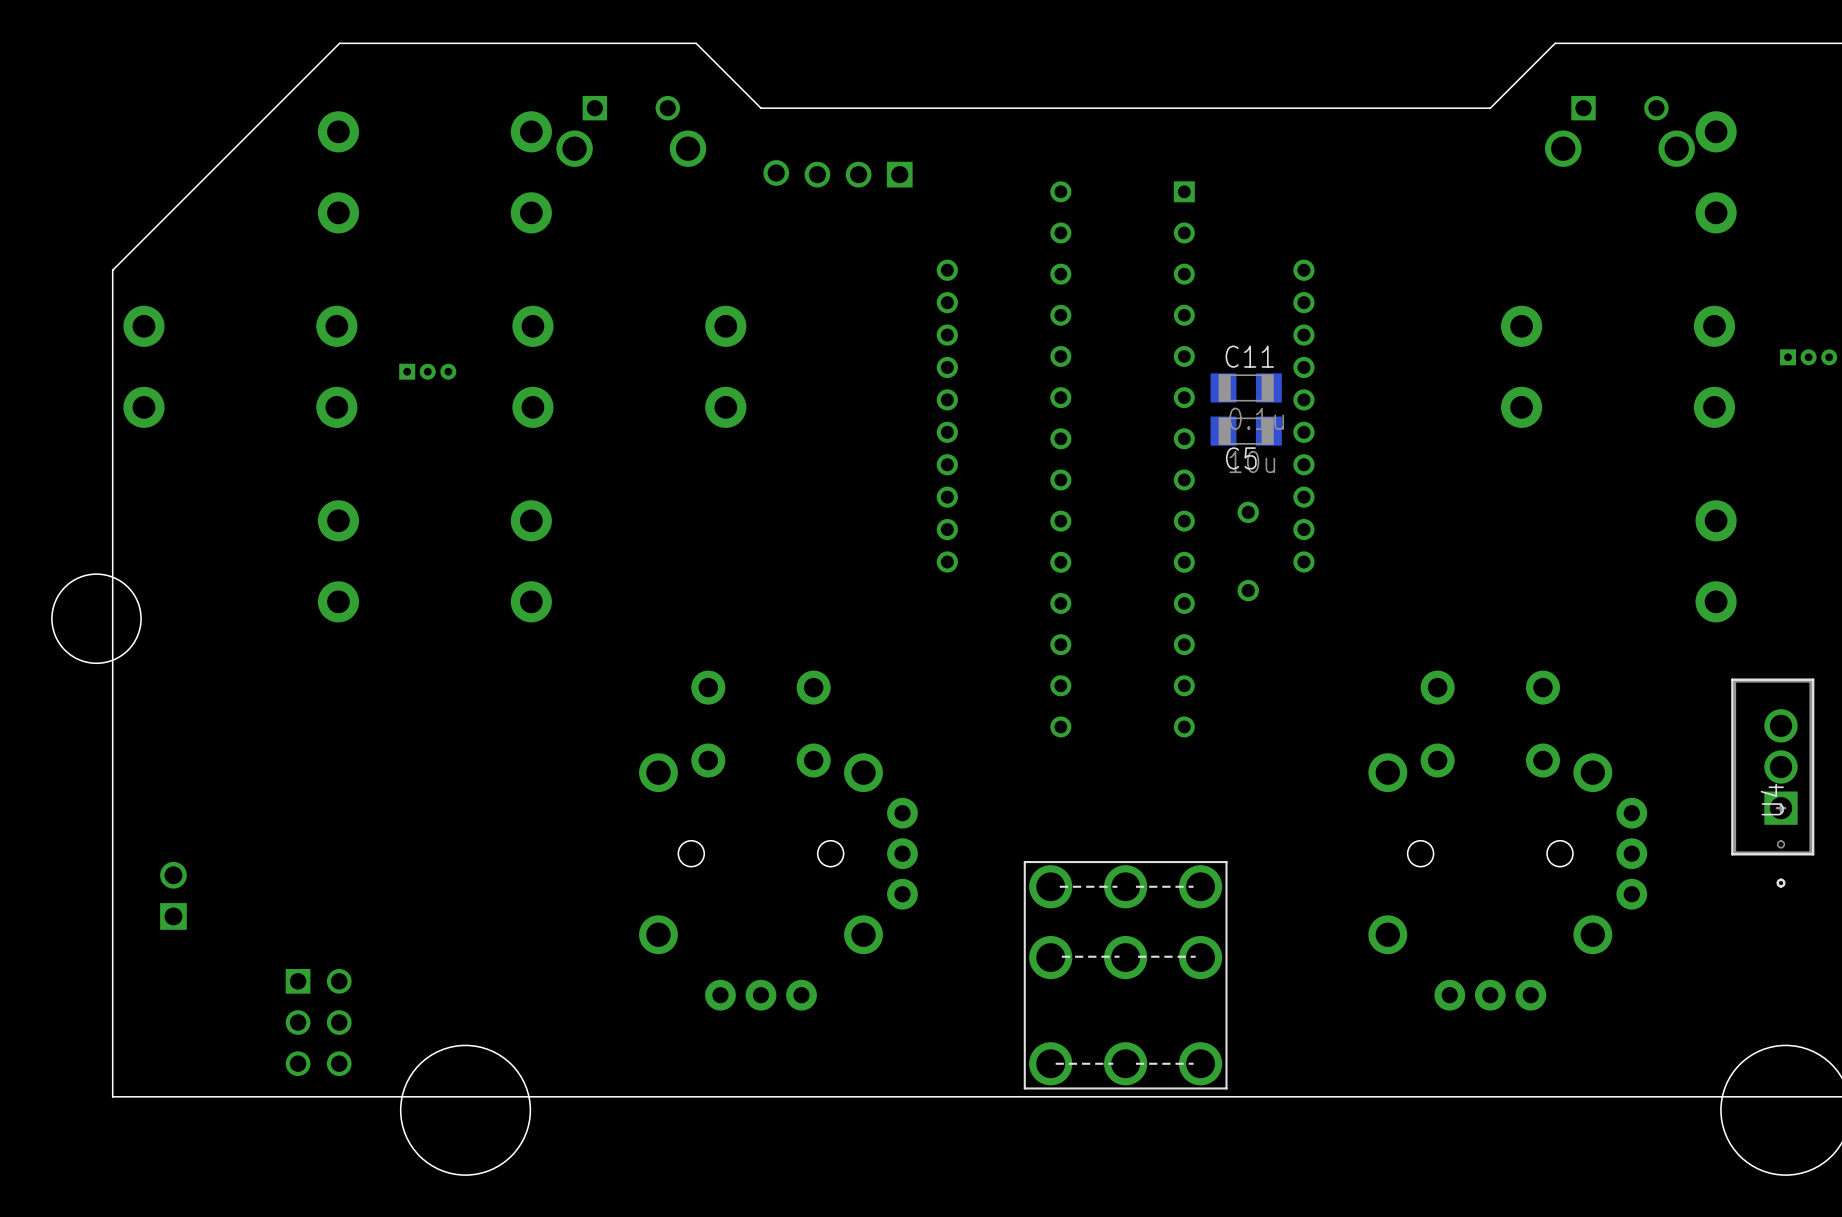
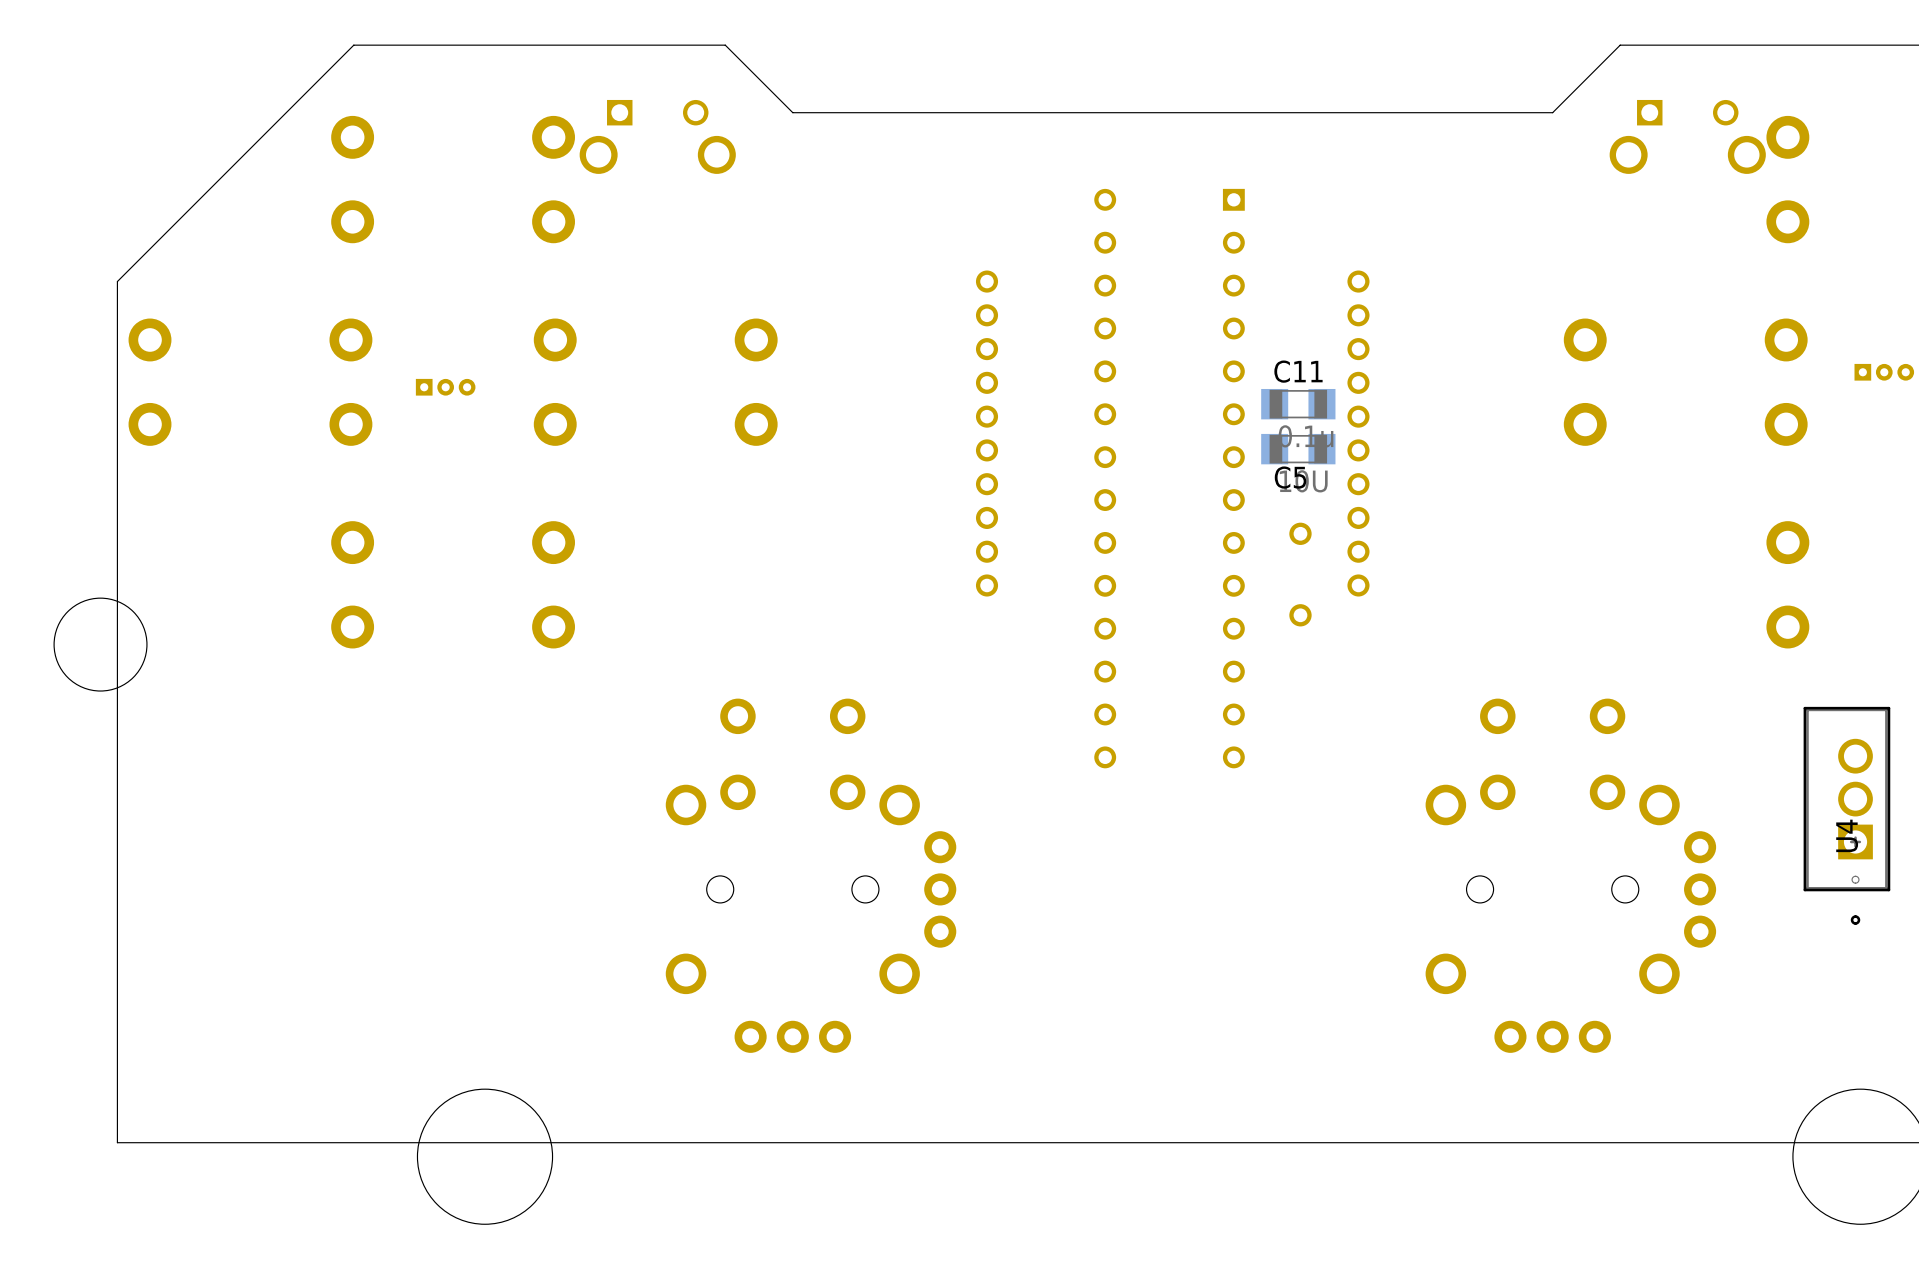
part: (838, 173) -> none
C5 value: 10u (1252, 461) -> 10U (1303, 481)
part: (173, 895) -> none
part: (1125, 975) -> none
part: (318, 1022) -> none

